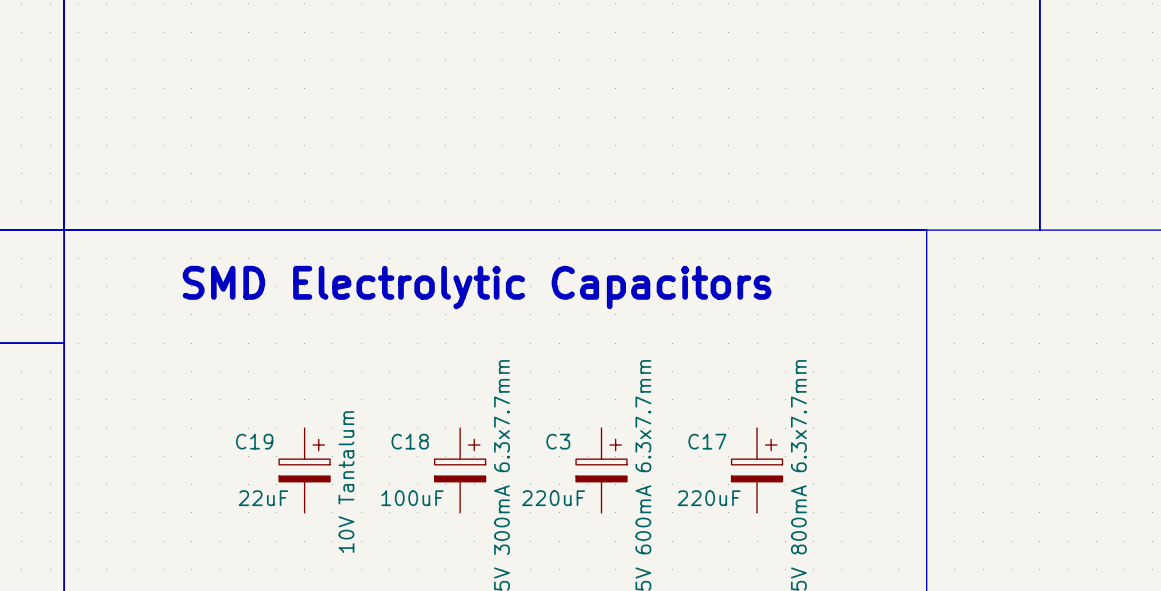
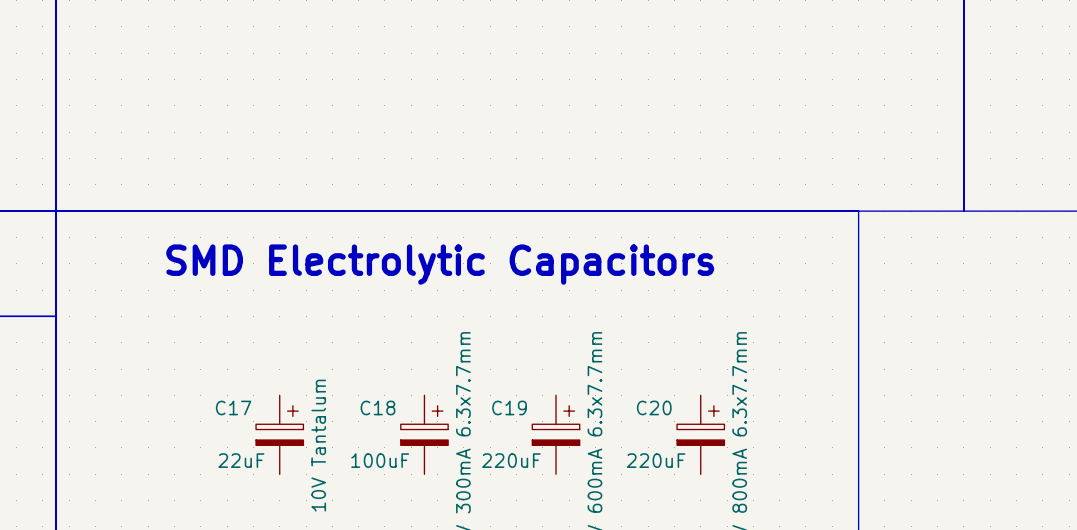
C19 name: C19 (254, 441) -> C17 (233, 407)
C3 name: C3 (558, 441) -> C19 (509, 407)
C17 name: C17 (707, 441) -> C20 (654, 407)

